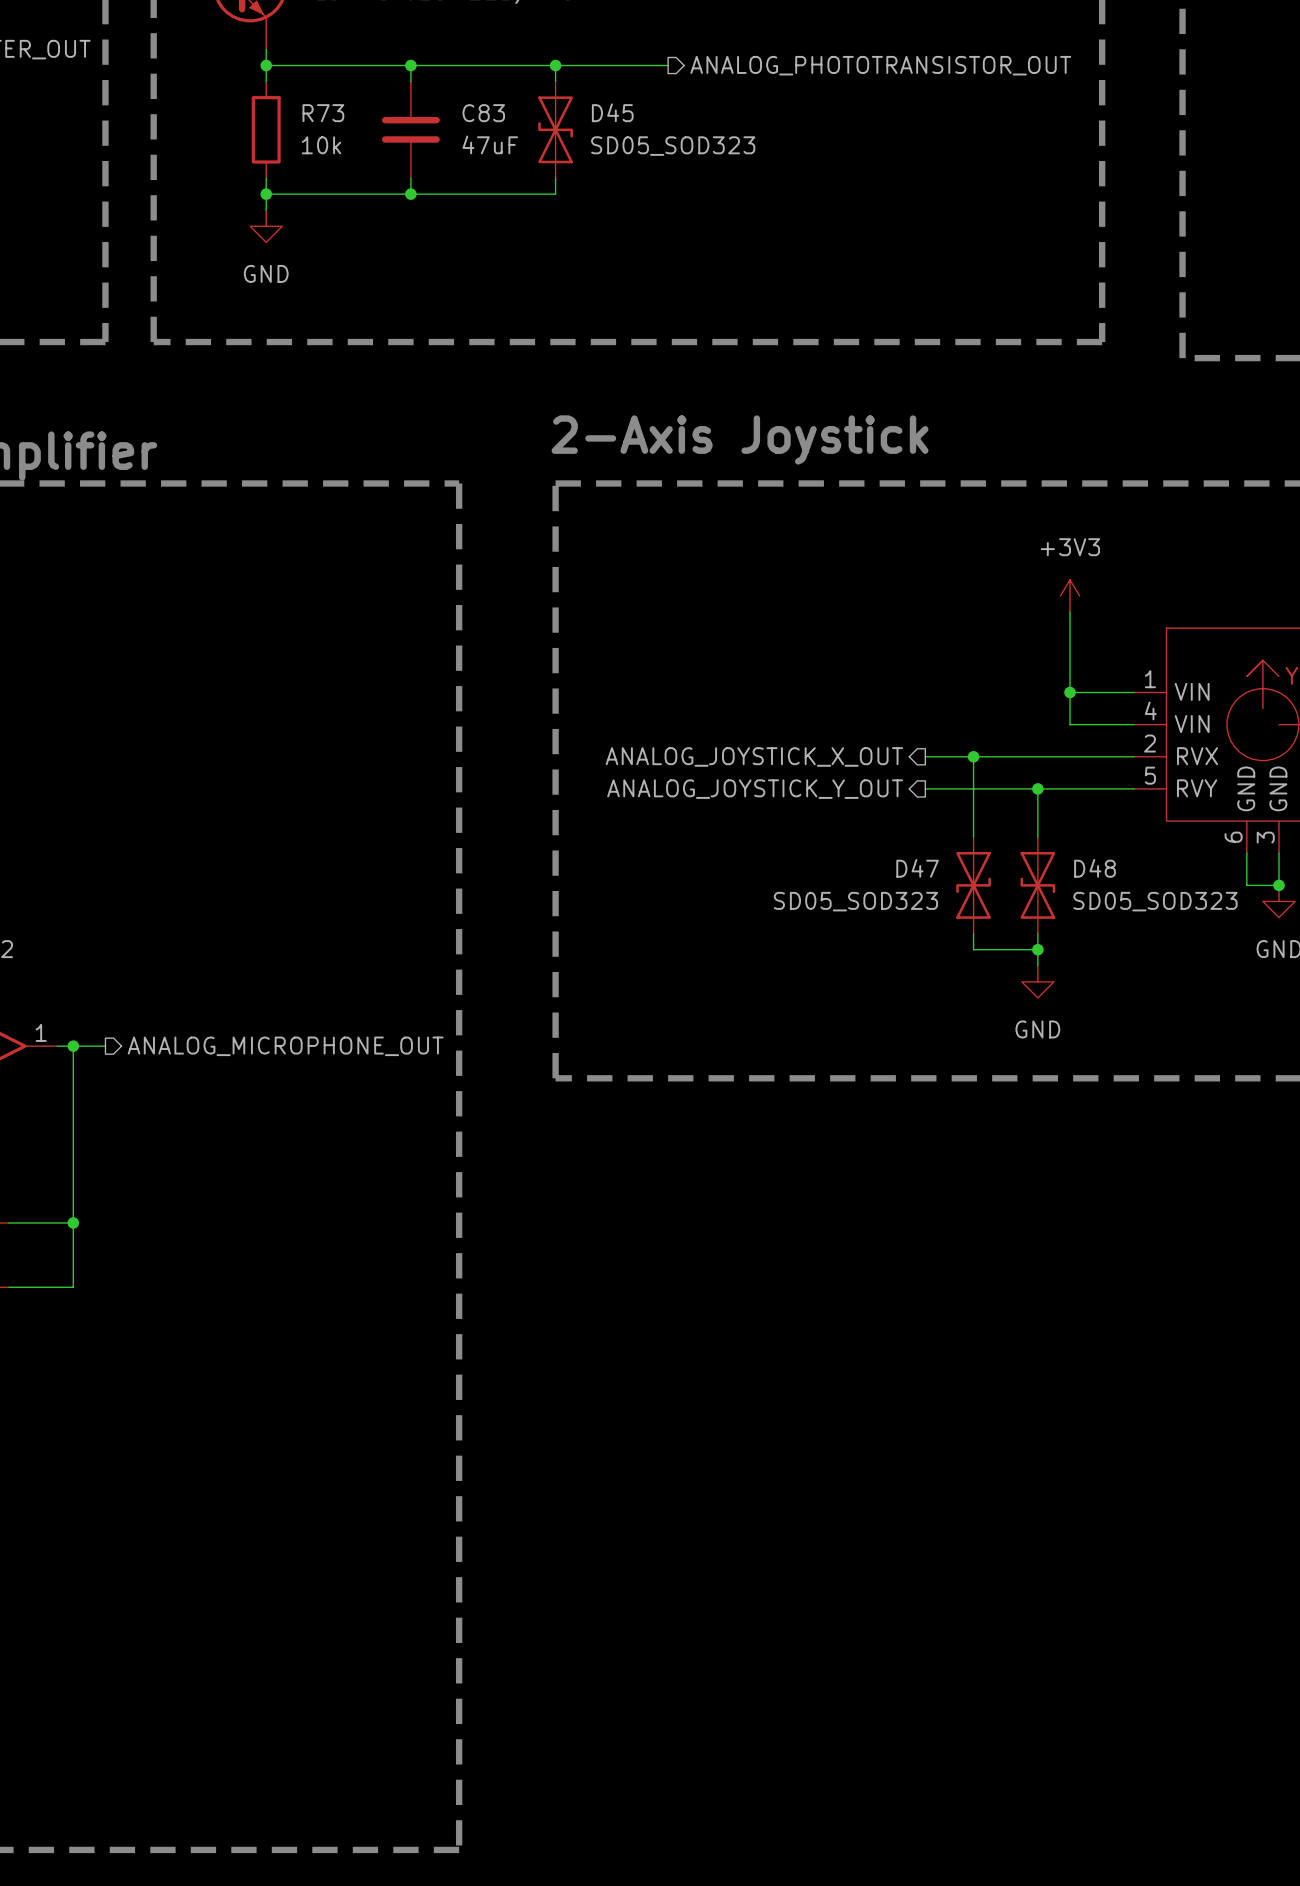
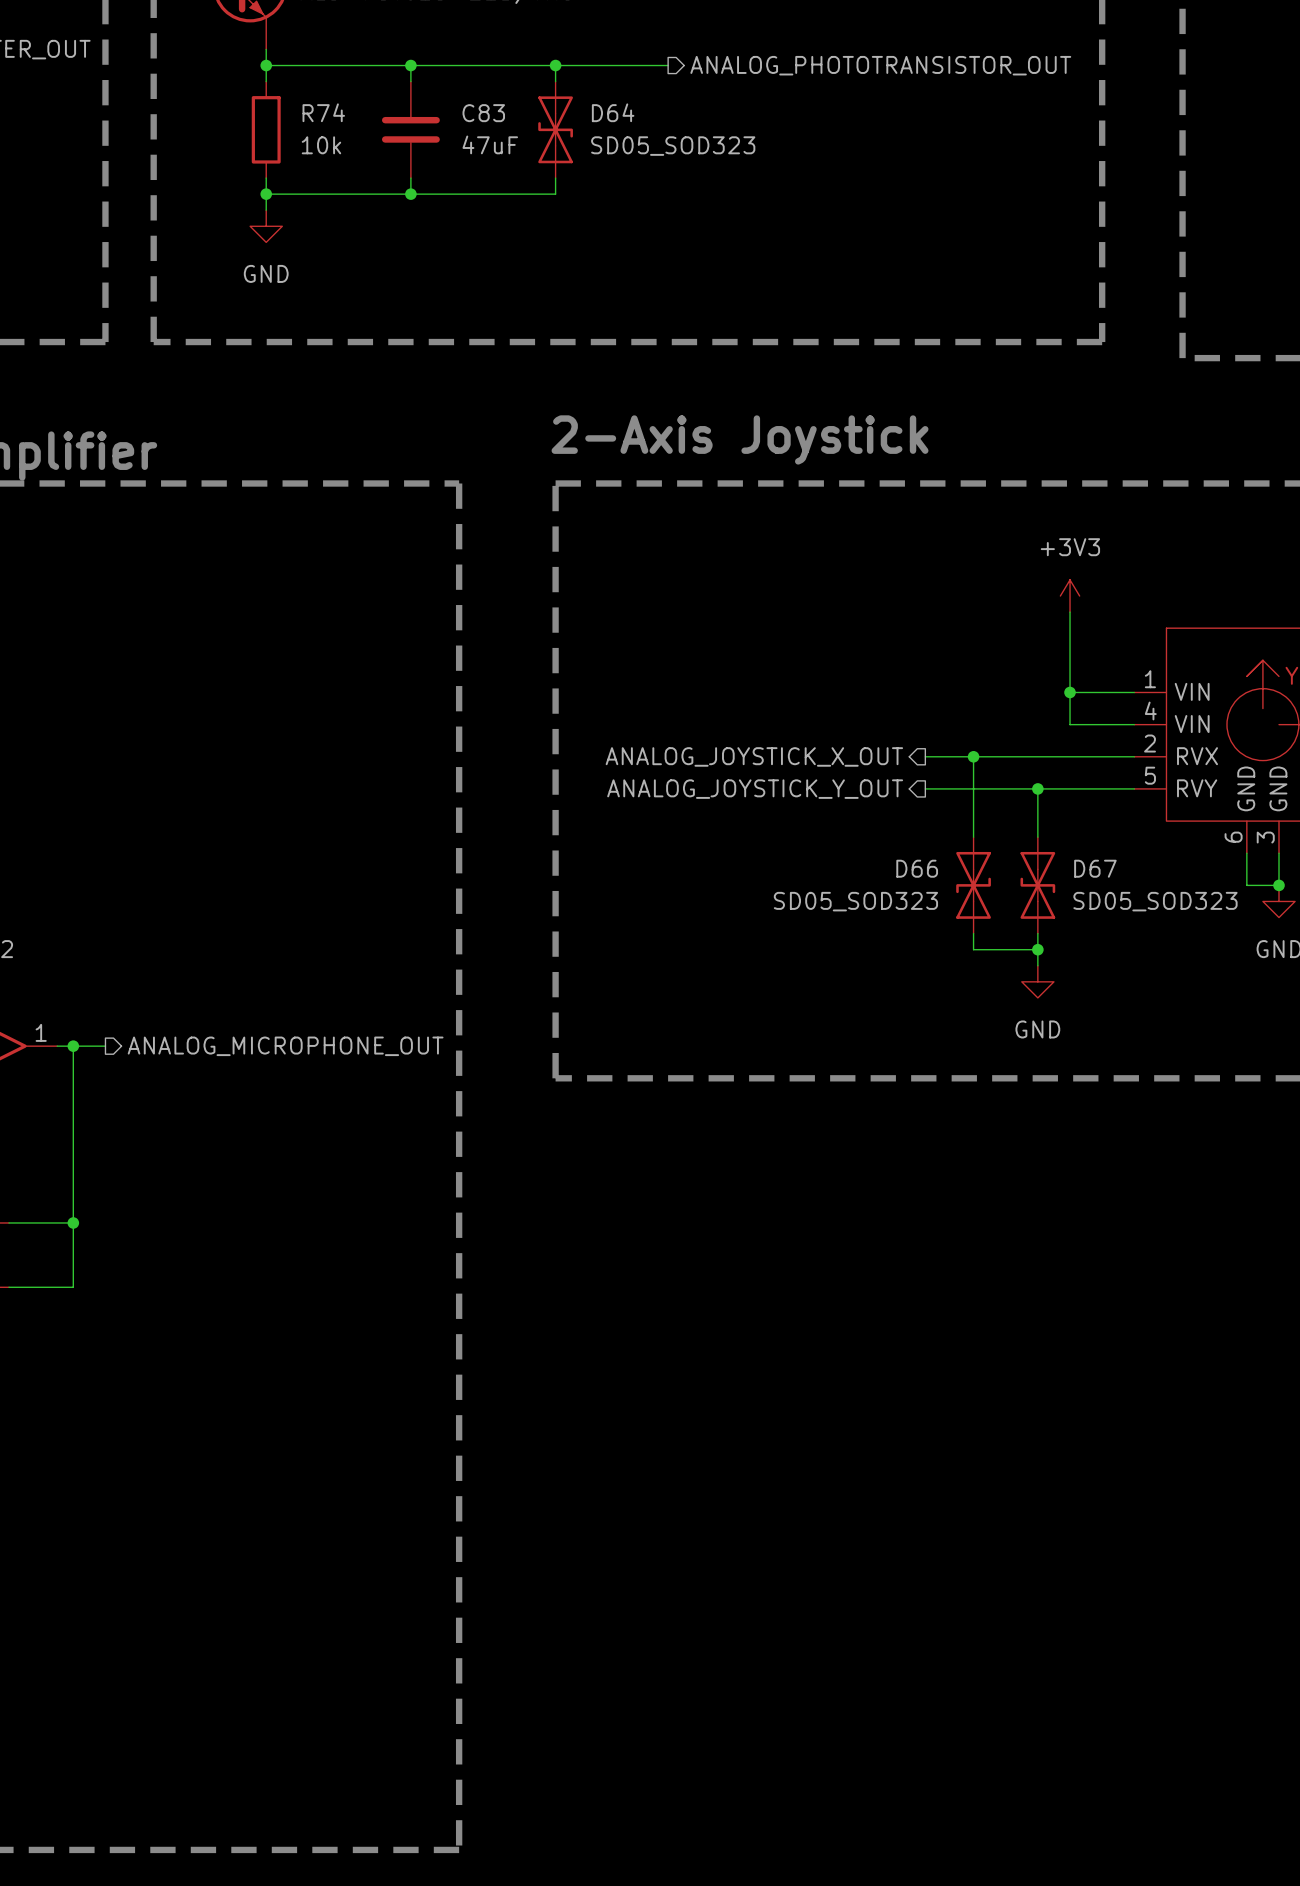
D45 name: D45 (612, 112) -> D64 (613, 112)
R73 name: R73 (323, 113) -> R74 (323, 112)
D47 name: D47 (917, 868) -> D66 (917, 868)
D48 name: D48 (1095, 868) -> D67 (1095, 868)

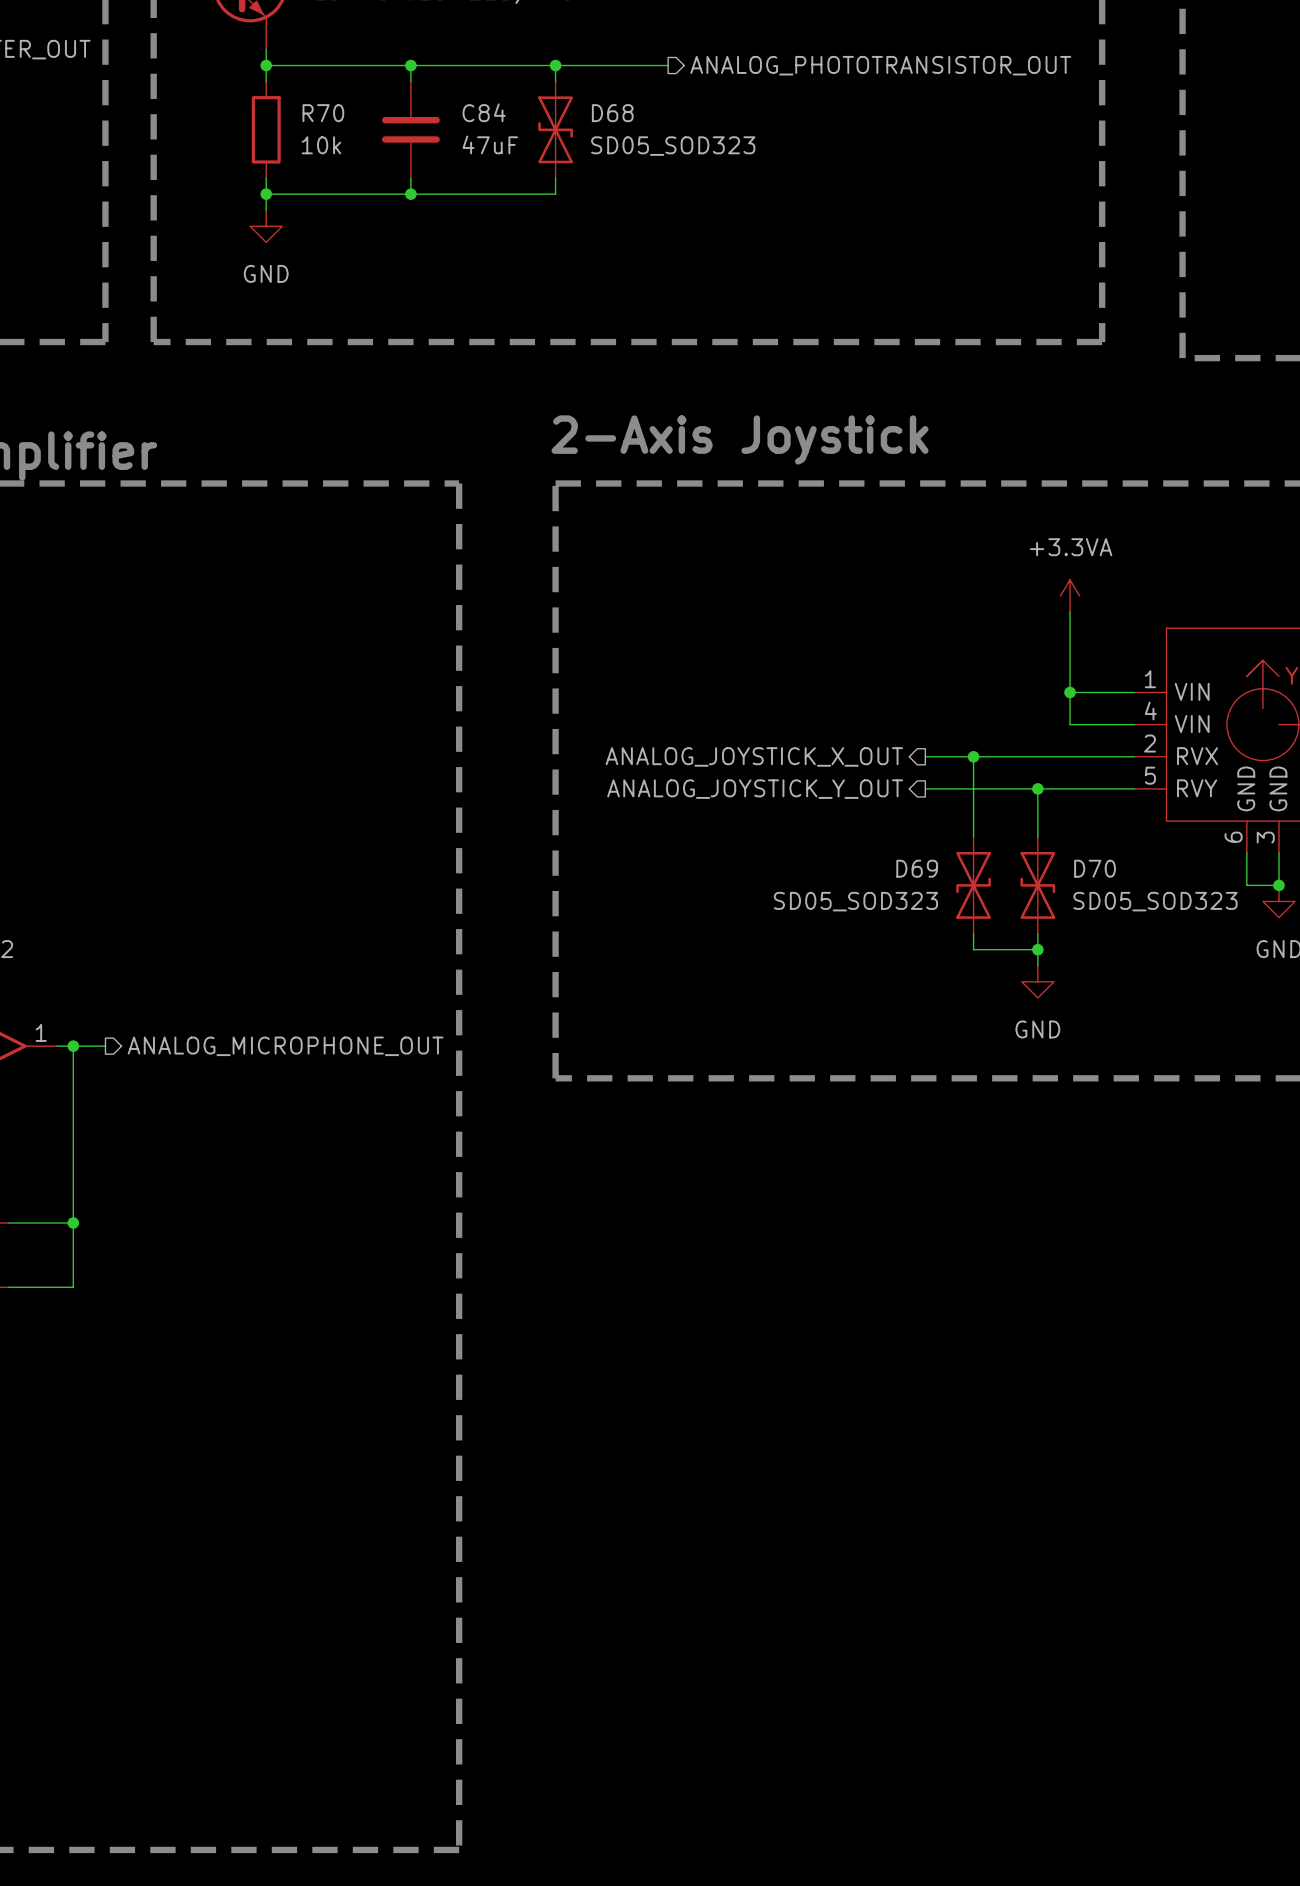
R74 name: R74 (323, 112) -> R70 (323, 113)
D64 name: D64 (613, 112) -> D68 (612, 113)
C83 name: C83 (483, 113) -> C84 (484, 112)
power symbol: +3V3 (1070, 596) -> +3.3VA (1070, 596)
D66 name: D66 (917, 868) -> D69 (917, 868)
D67 name: D67 (1095, 868) -> D70 (1095, 868)

